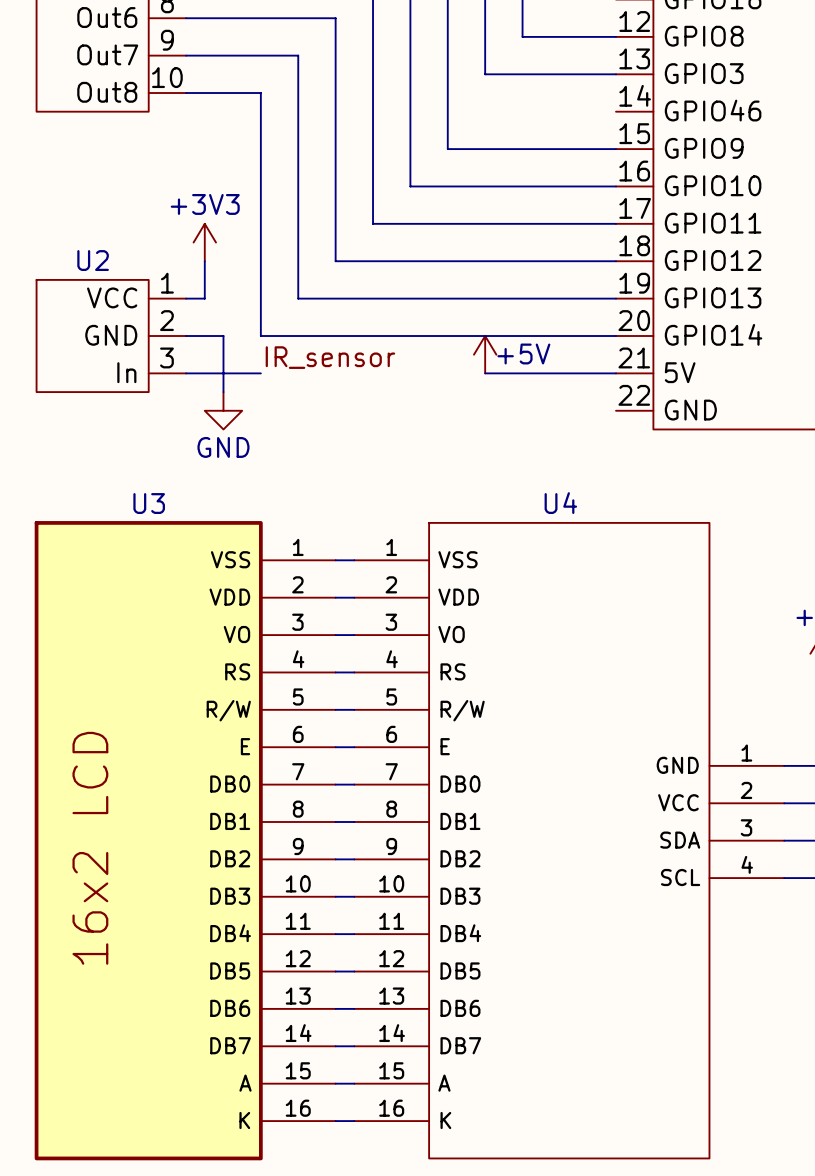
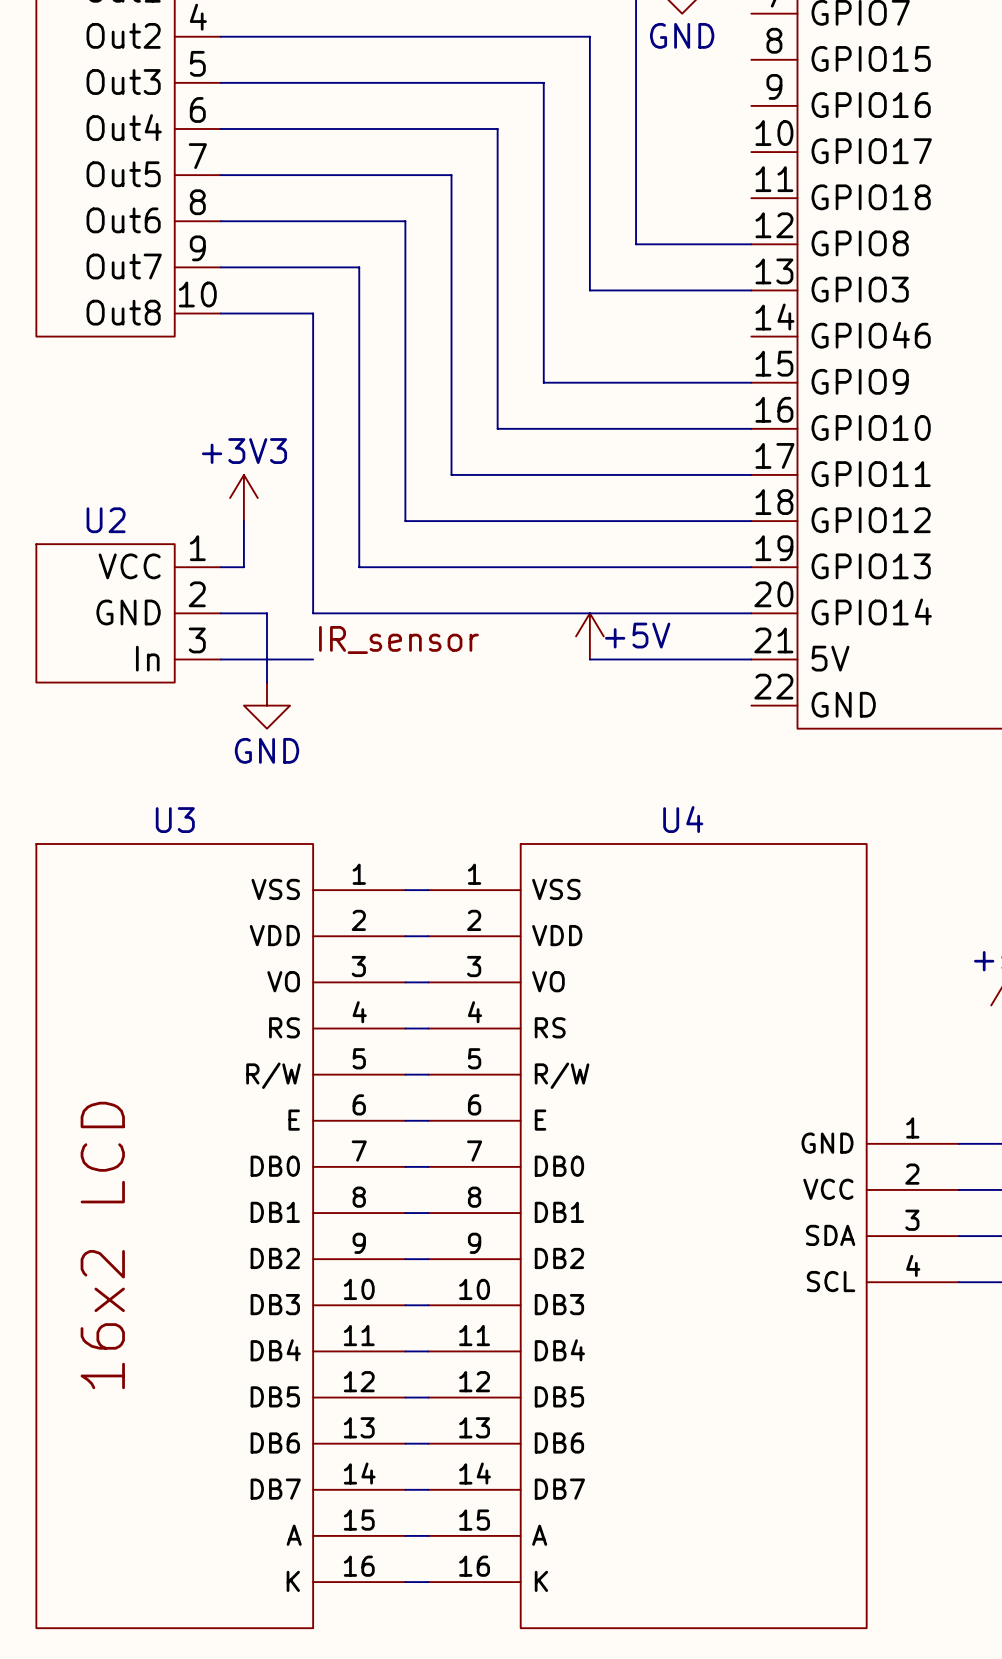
U3 symbol: [34, 521, 336, 1161] -> [36, 844, 406, 1629]

